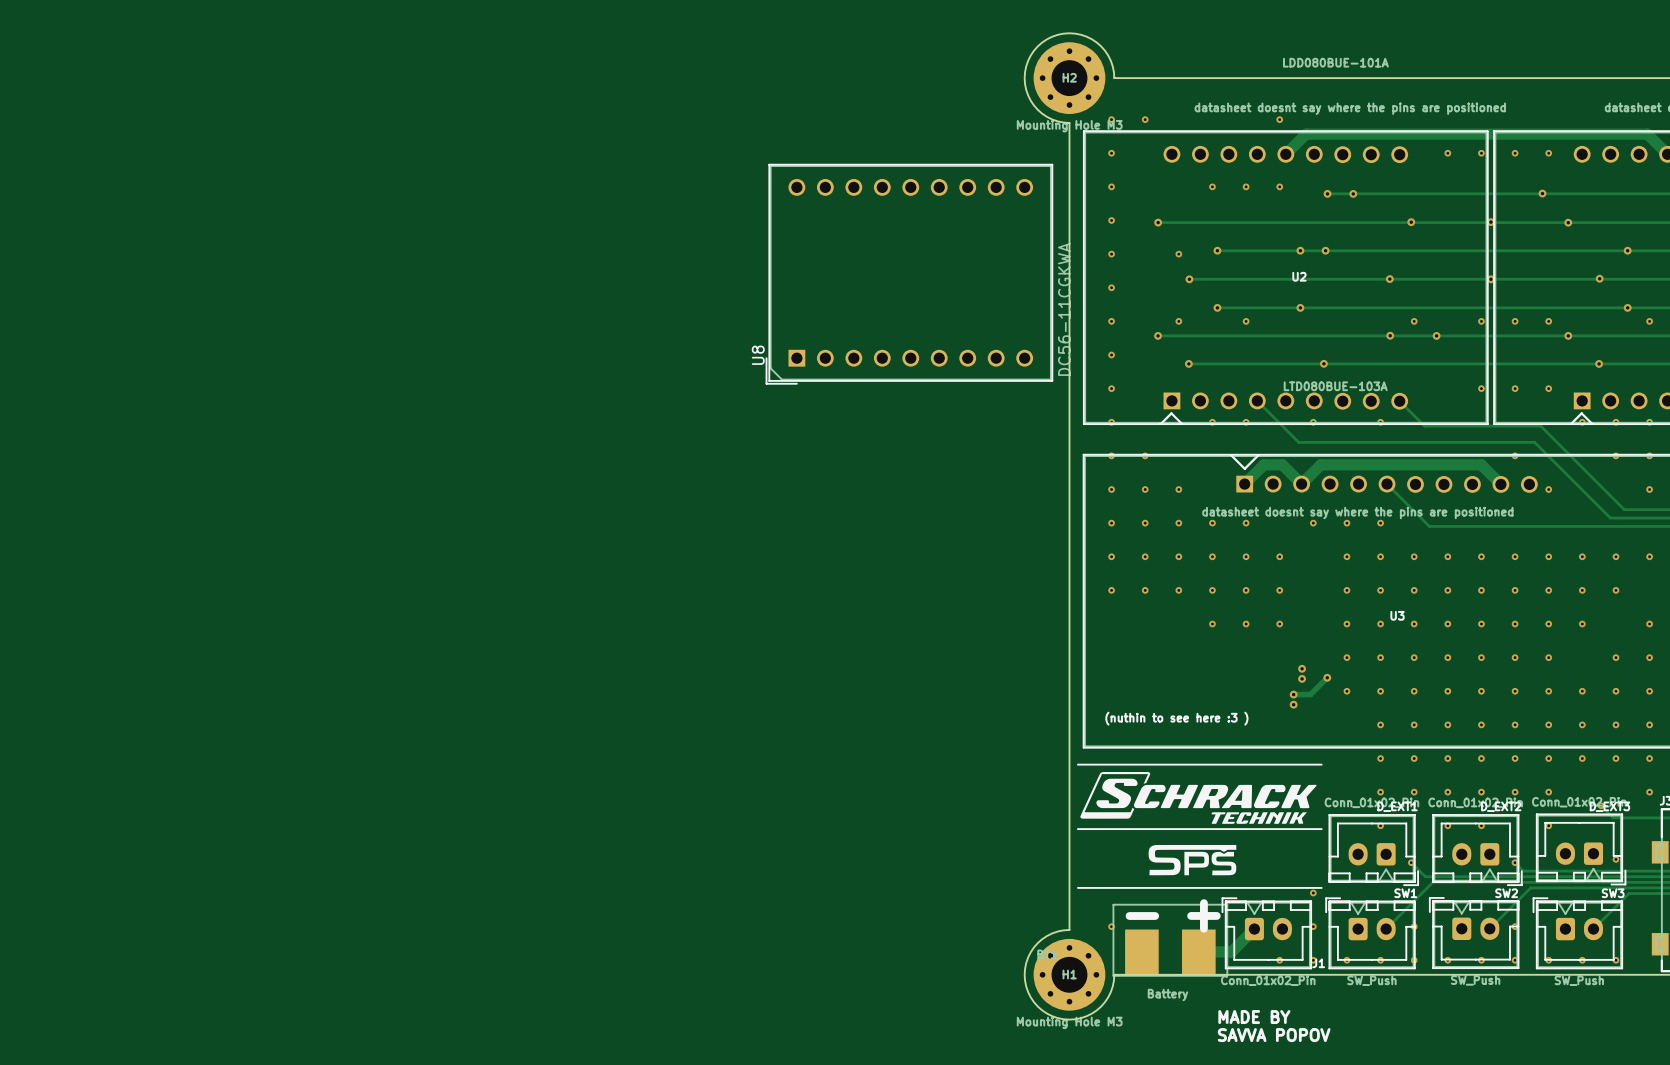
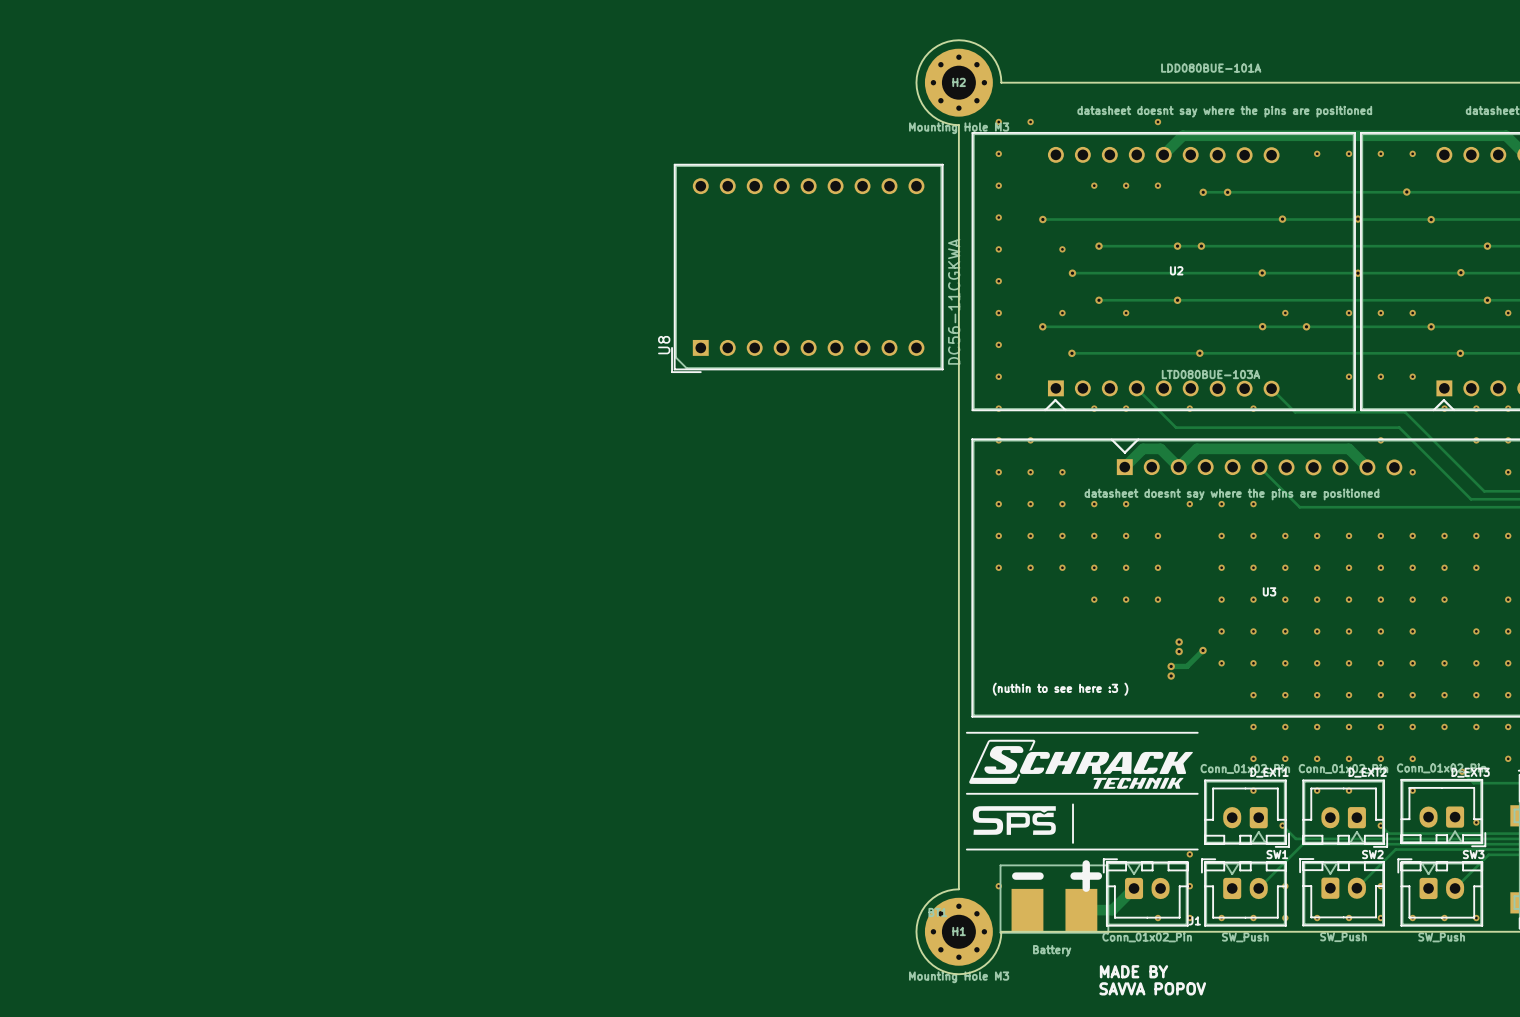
line: none -> (1073, 804) (1073, 842)
drawing position: (1192, 860) -> (1014, 820)

